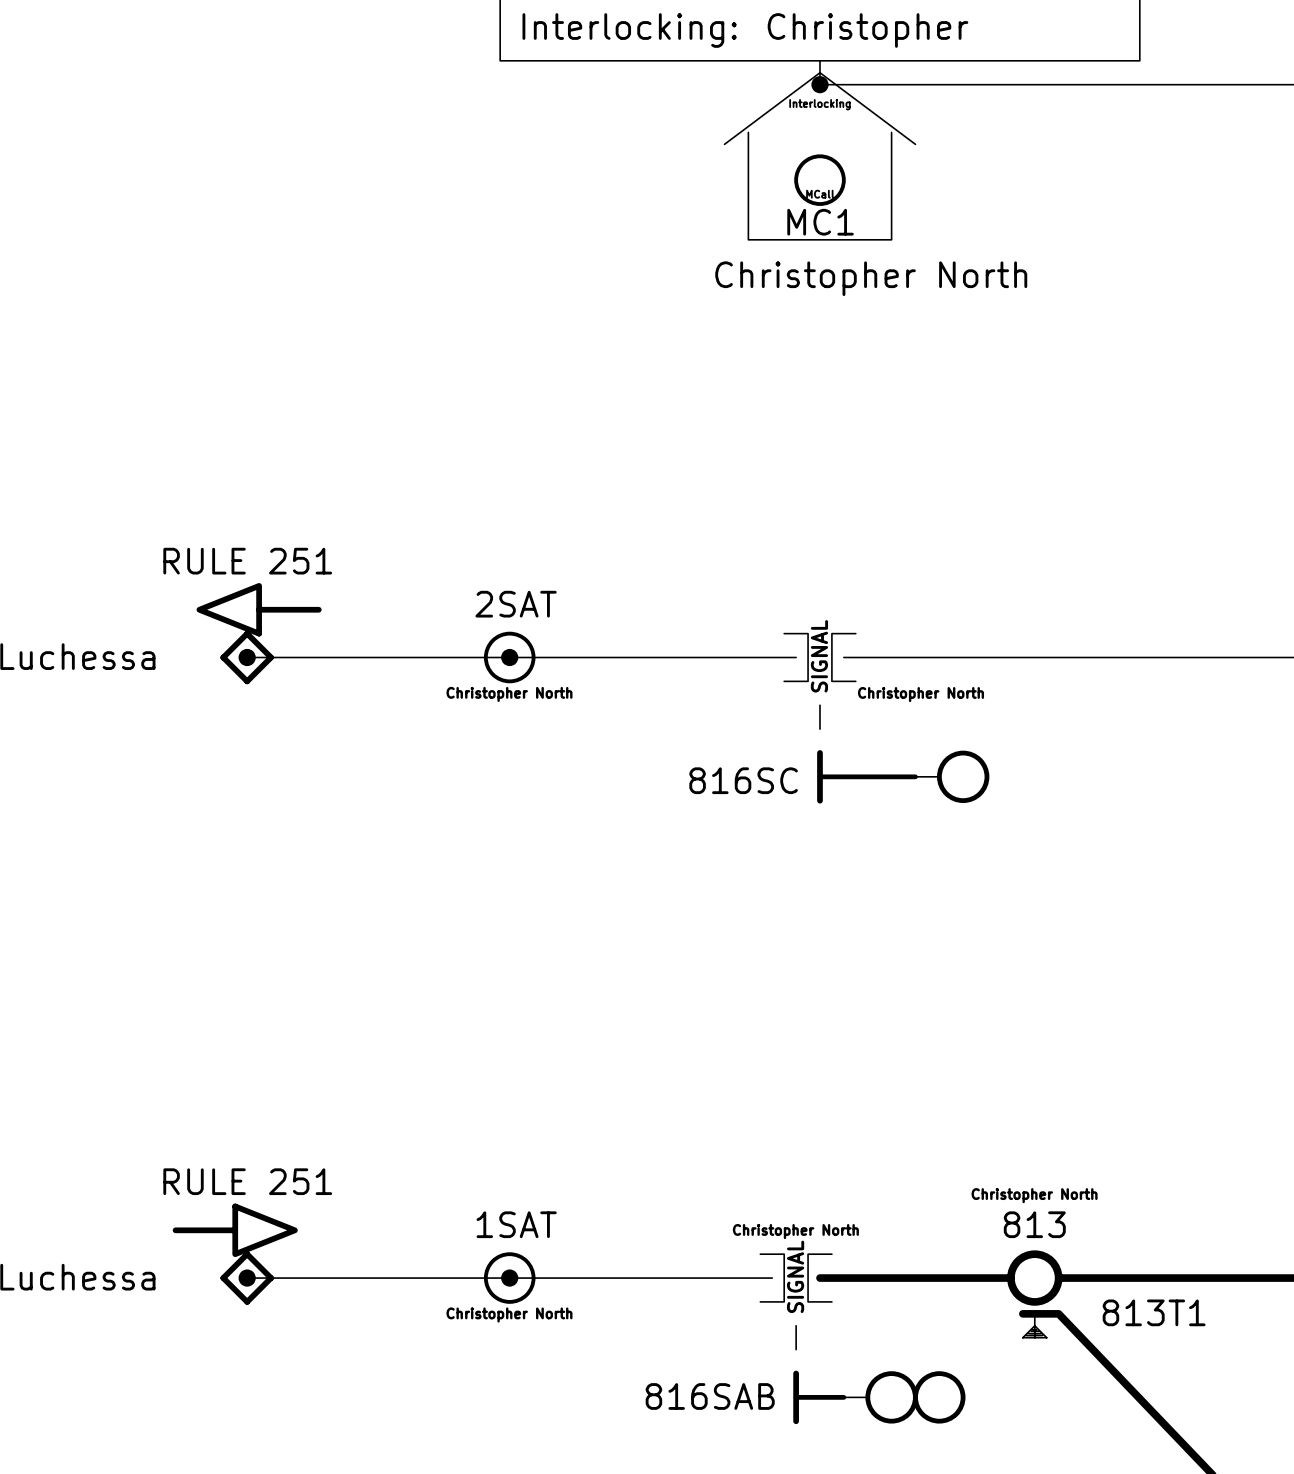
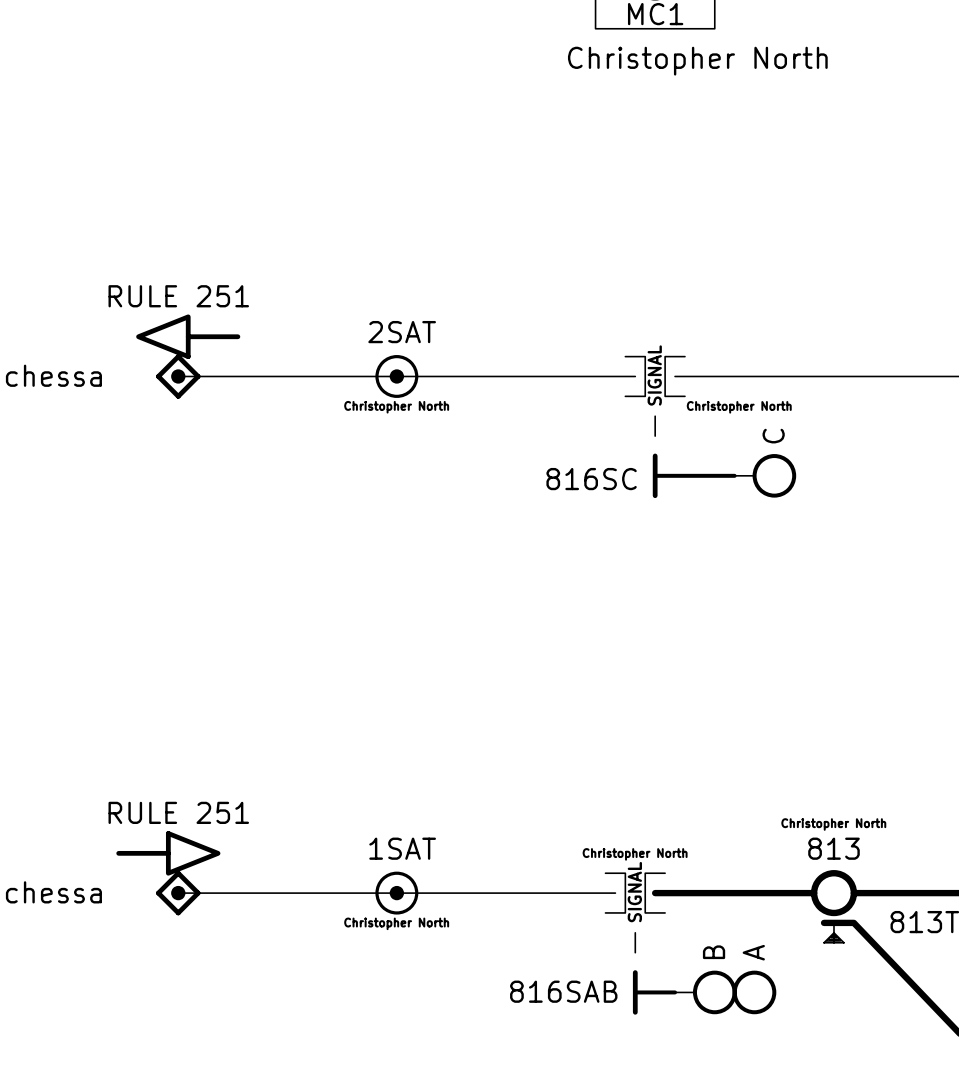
part value: none -> C (773, 436)
part value: none -> B (714, 952)
part value: none -> A (753, 952)

